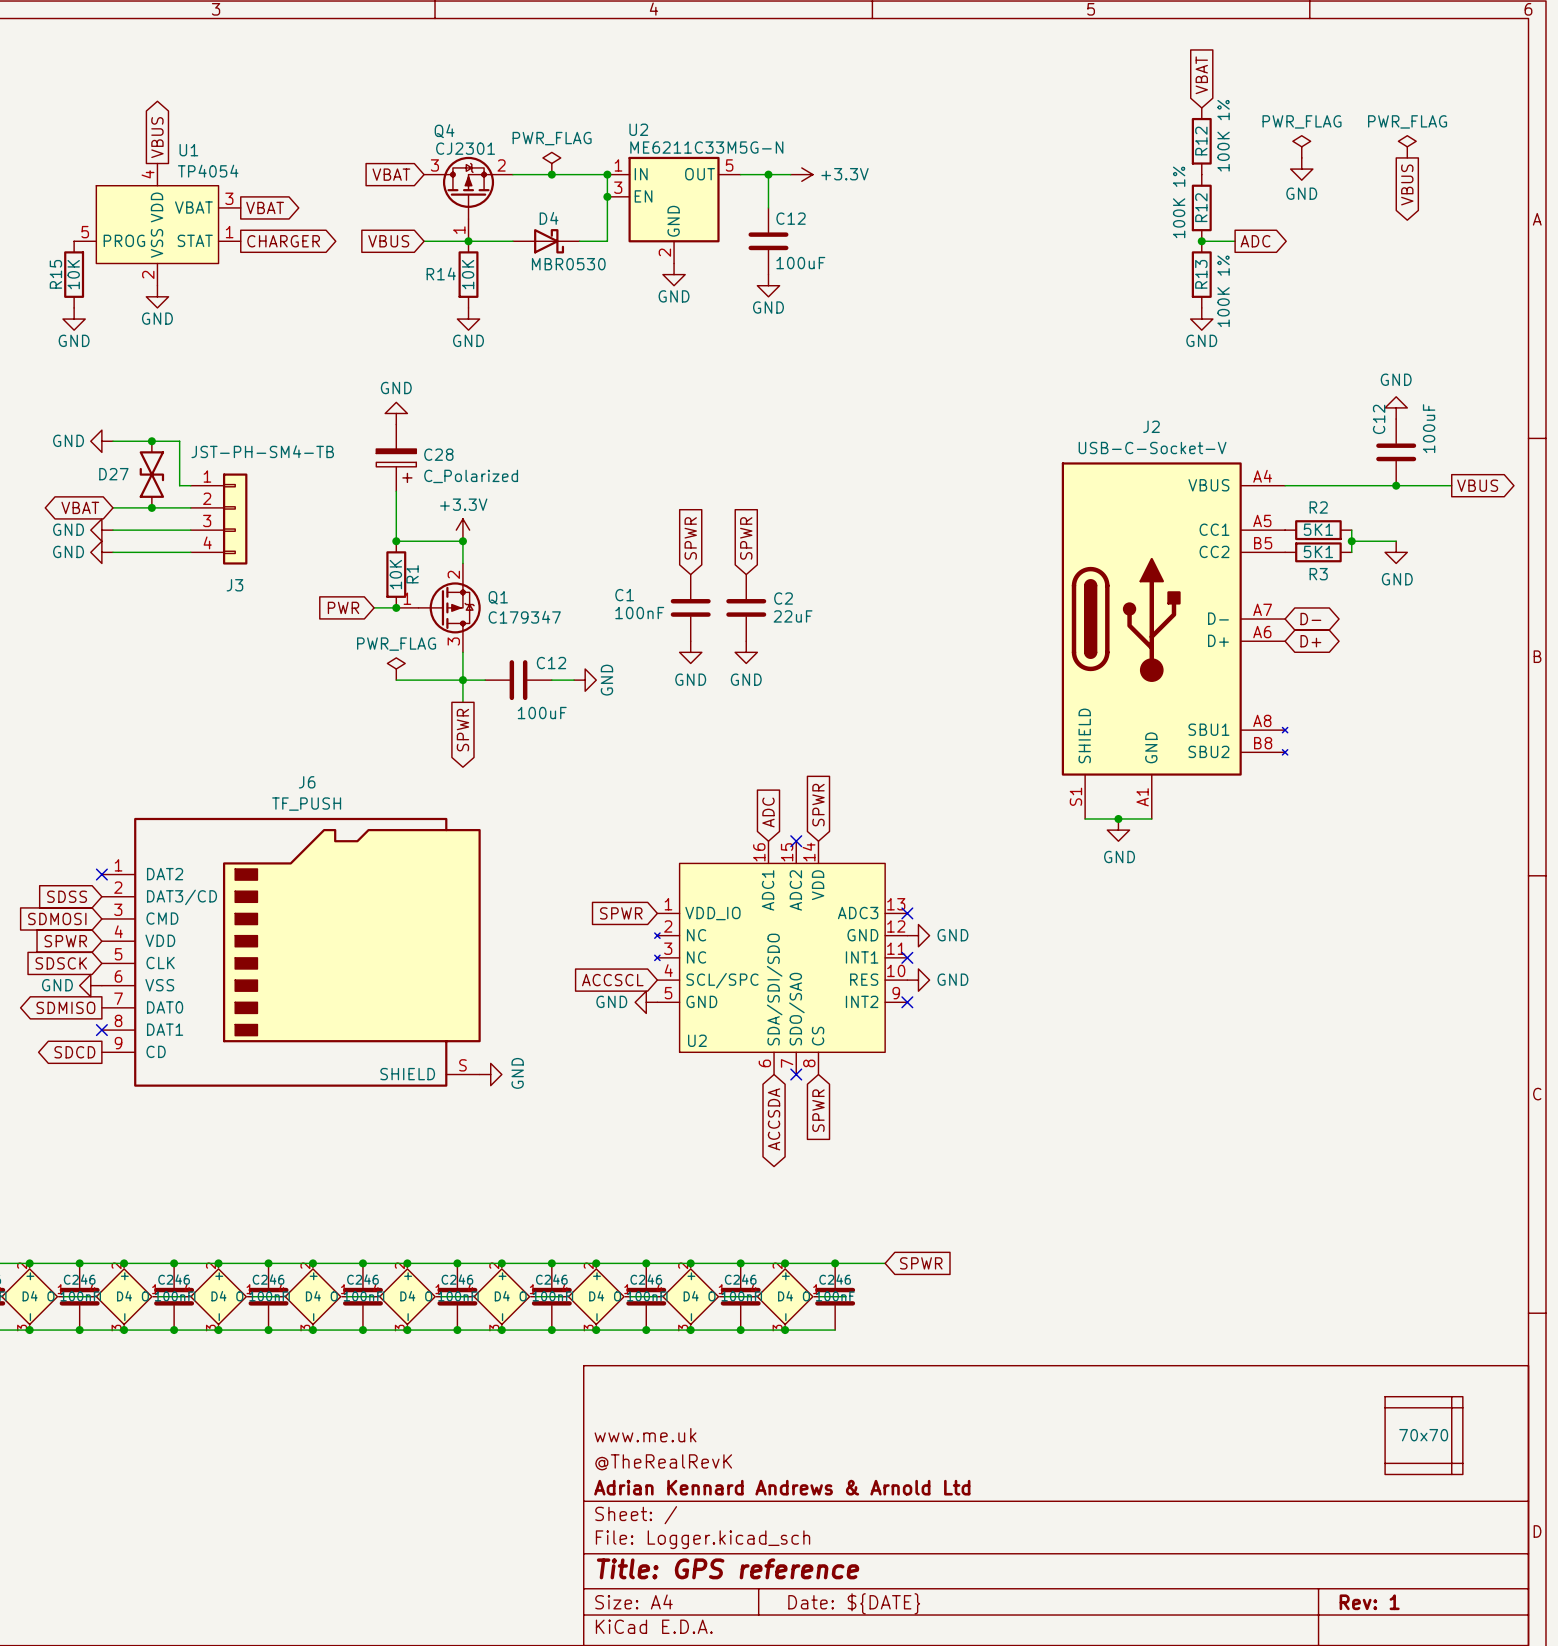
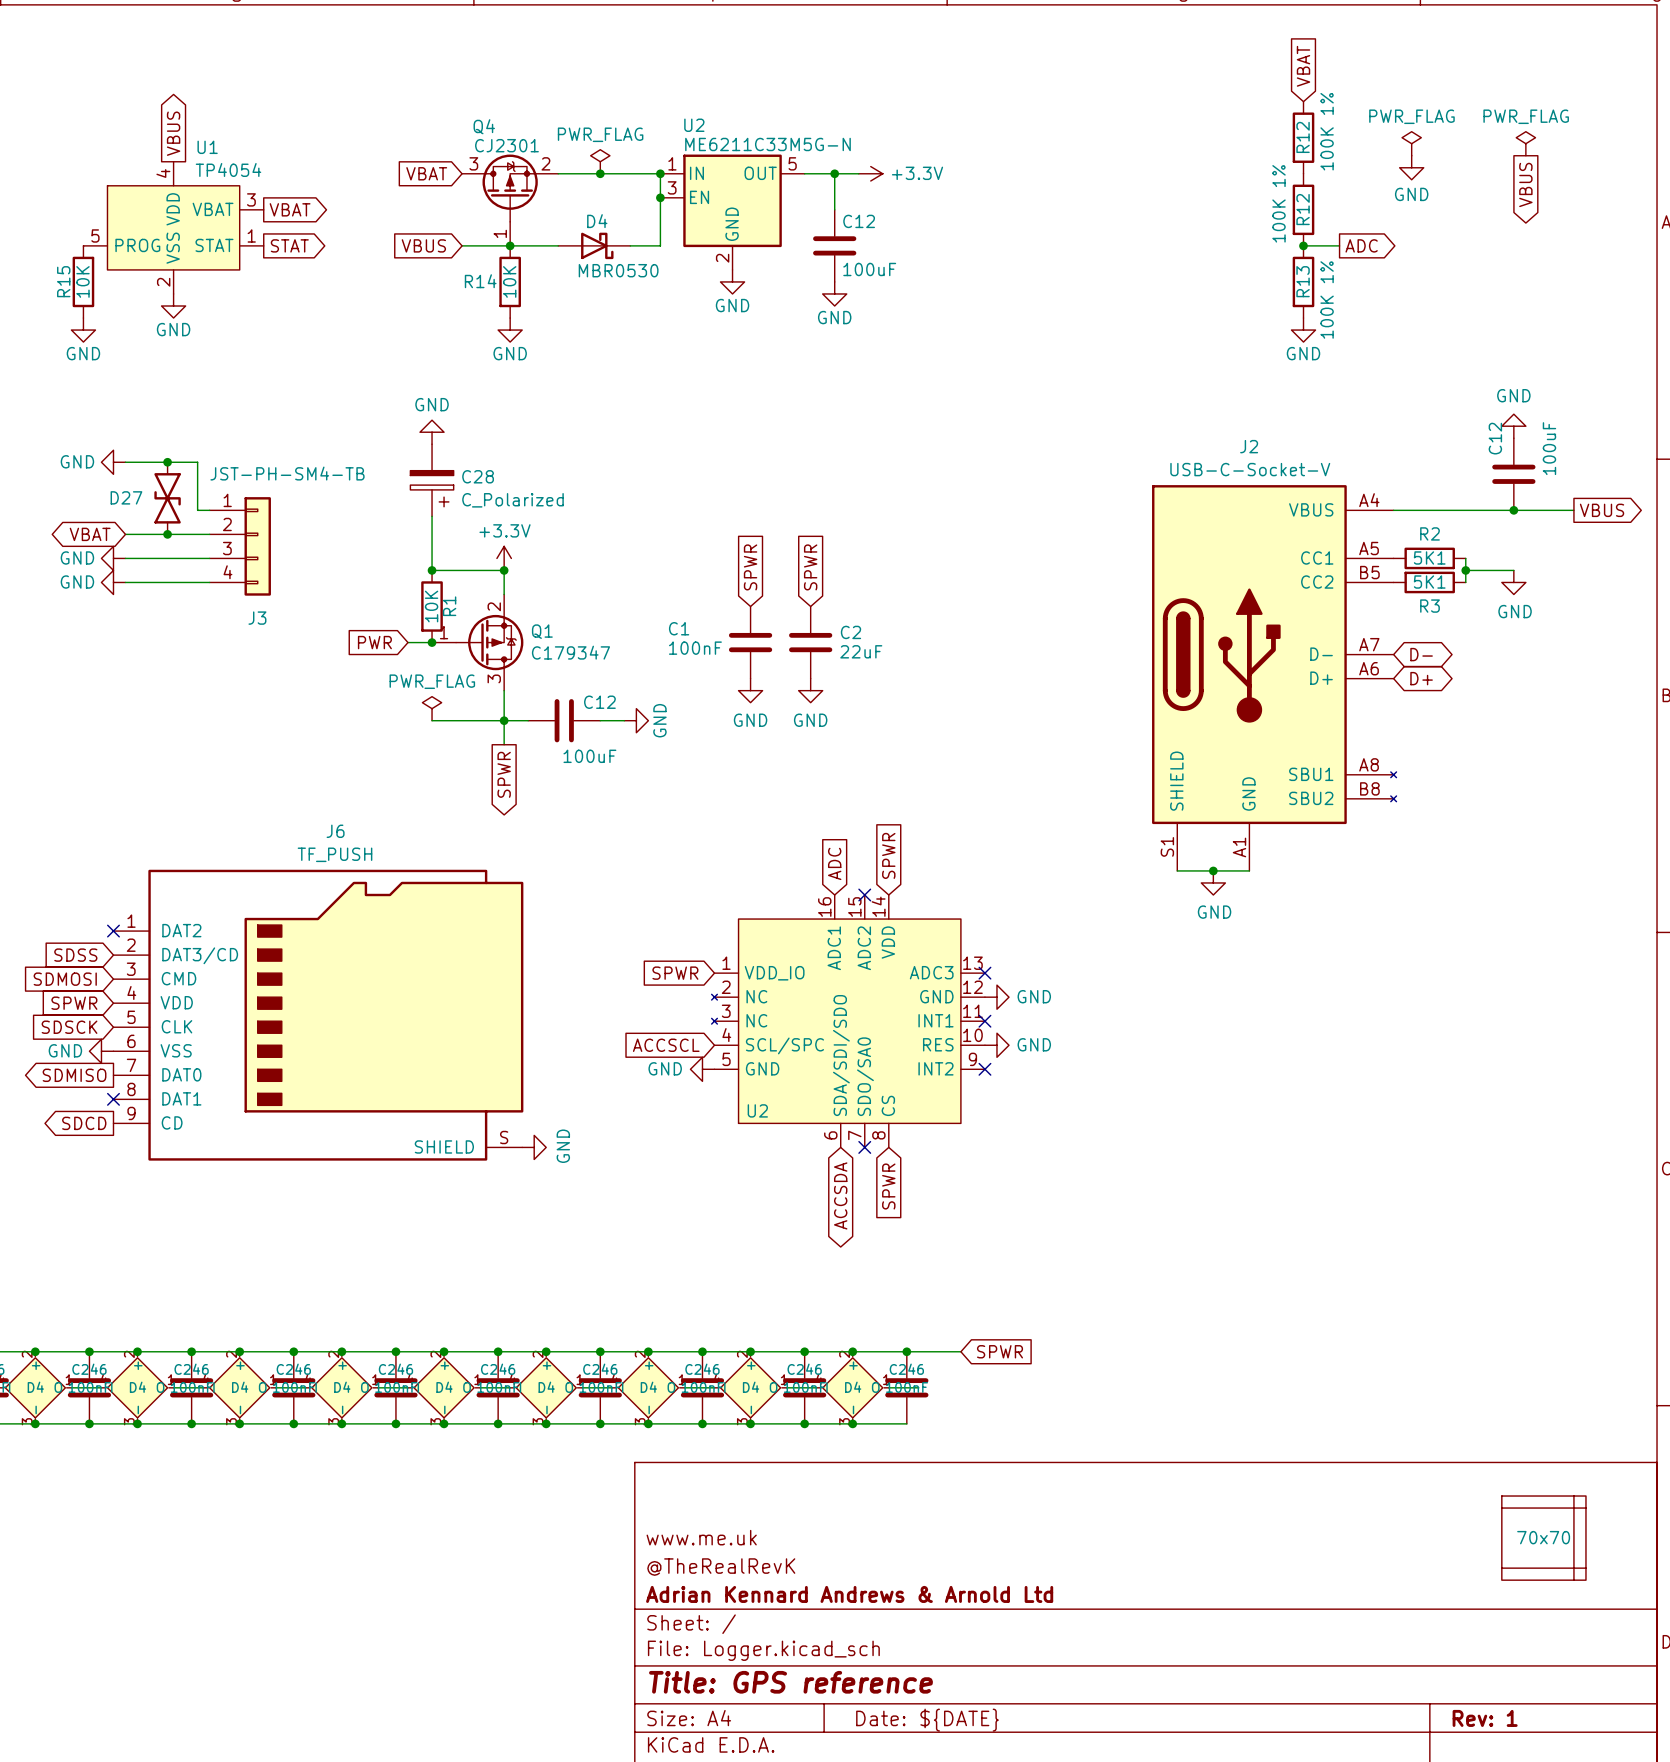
global label: CHARGER (283, 241) -> STAT (289, 245)

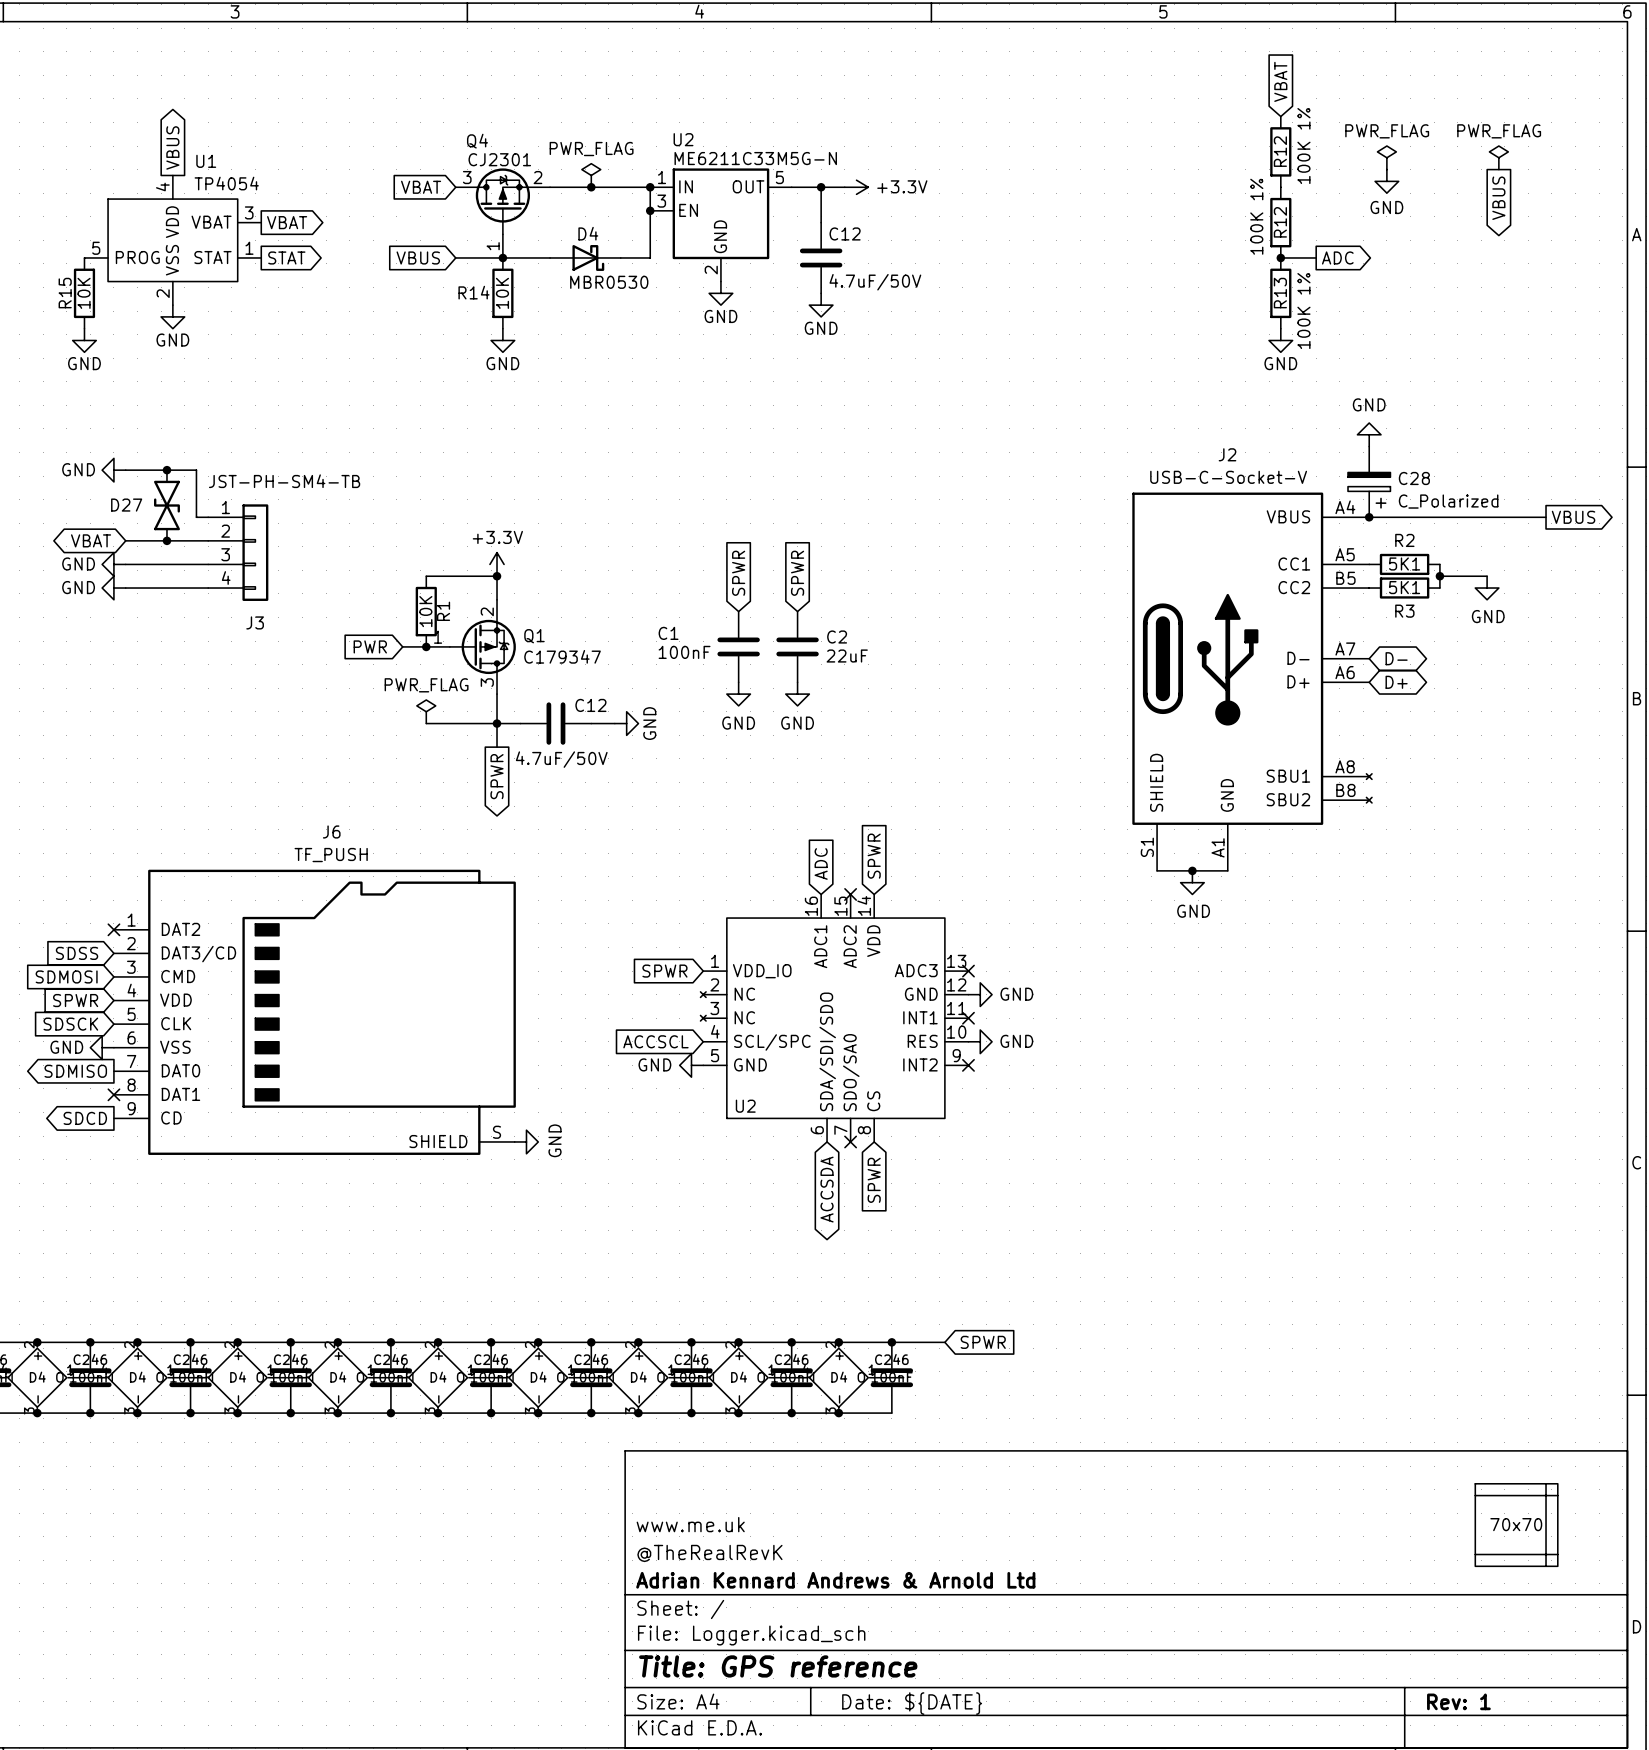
C12 value: 100uF (869, 269) -> 4.7uF/50V (875, 282)
power symbol position: GND (1513, 426) -> GND (1369, 434)
power symbol: GND (432, 432) -> none
C12: 100uF (1513, 474) -> none
C28 position: (432, 480) -> (1369, 481)
junction: none -> (1369, 517)
junction: (1513, 510) -> none
wire: (432, 516) (432, 570) -> none
junction: (432, 570) -> none
C12 value: 100uF (589, 756) -> 4.7uF/50V (561, 759)

